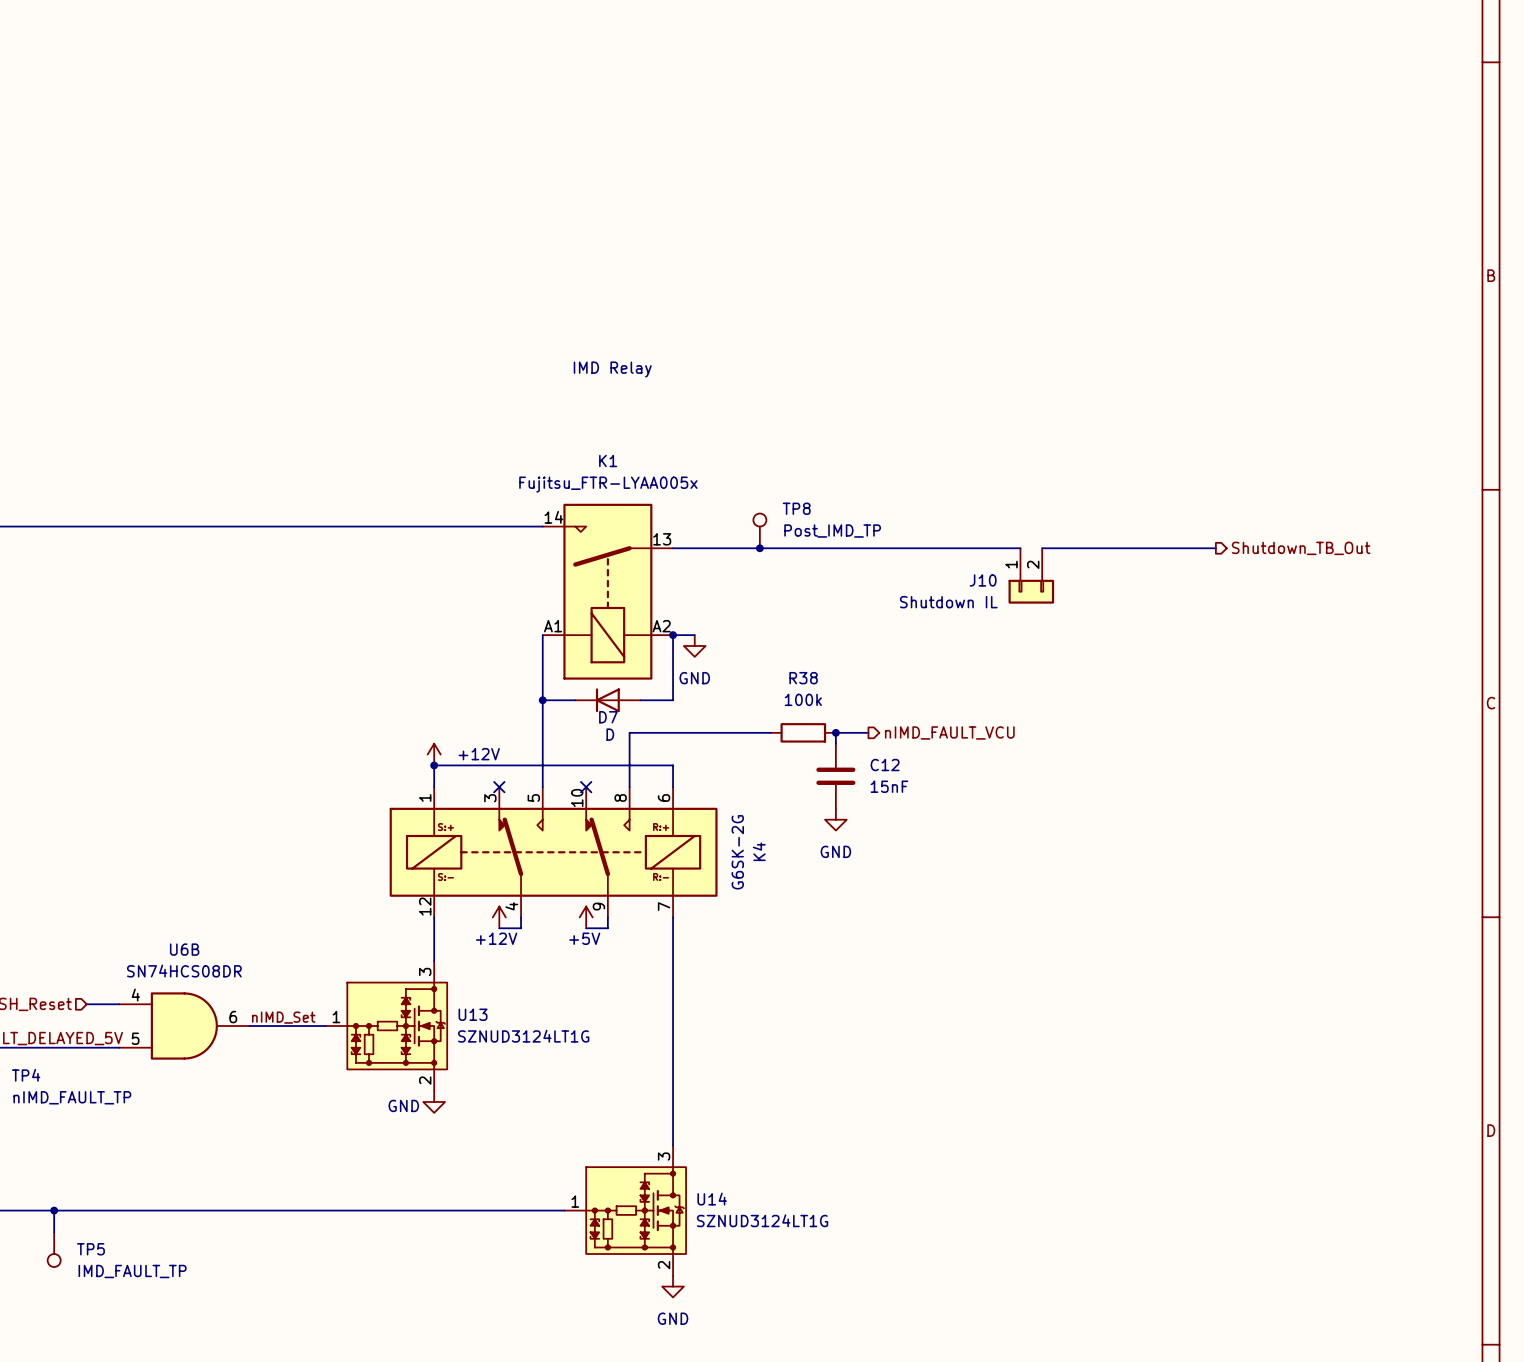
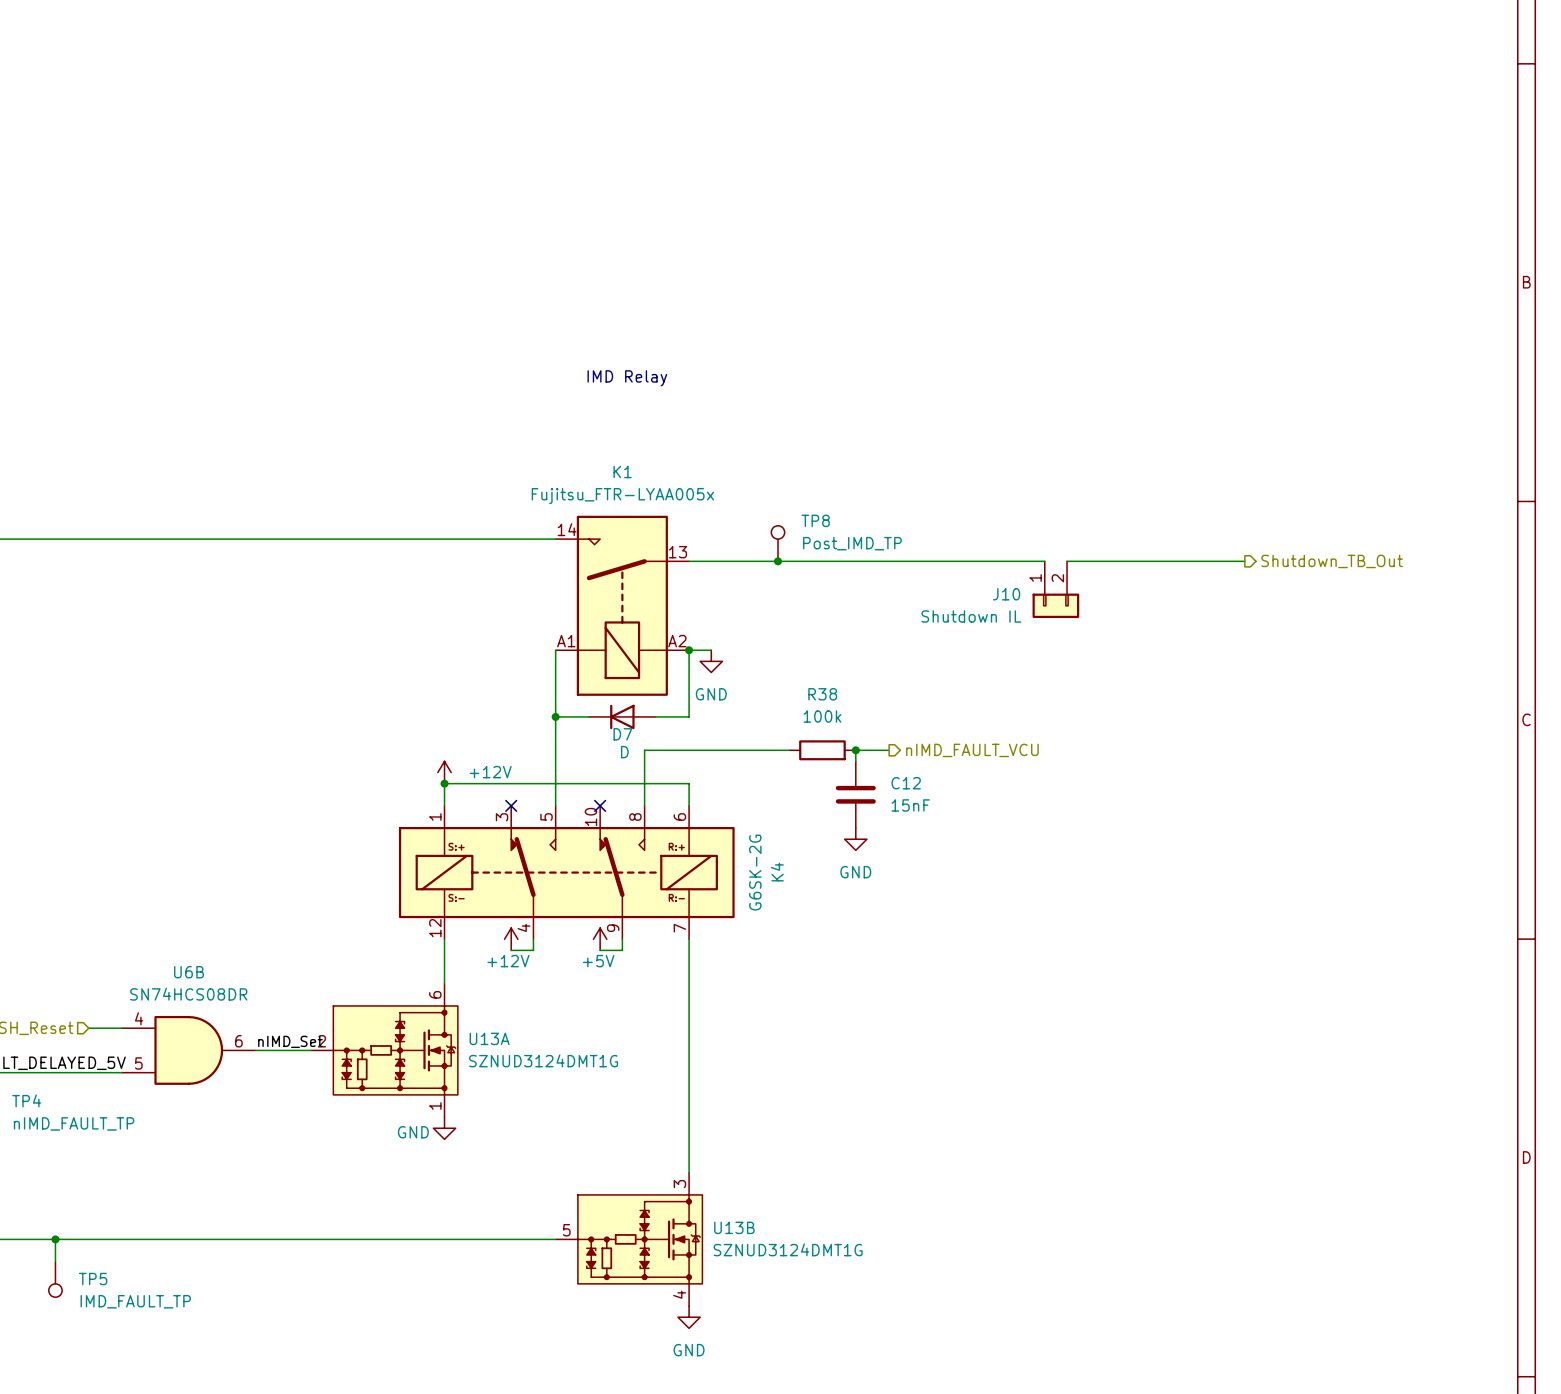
U13A: none -> SZNUD3124DMT1G (384, 1050)
U13: SZNUD3124LT1G (386, 1026) -> none
U13B: none -> SZNUD3124DMT1G (629, 1239)
U14: SZNUD3124LT1G (625, 1210) -> none

